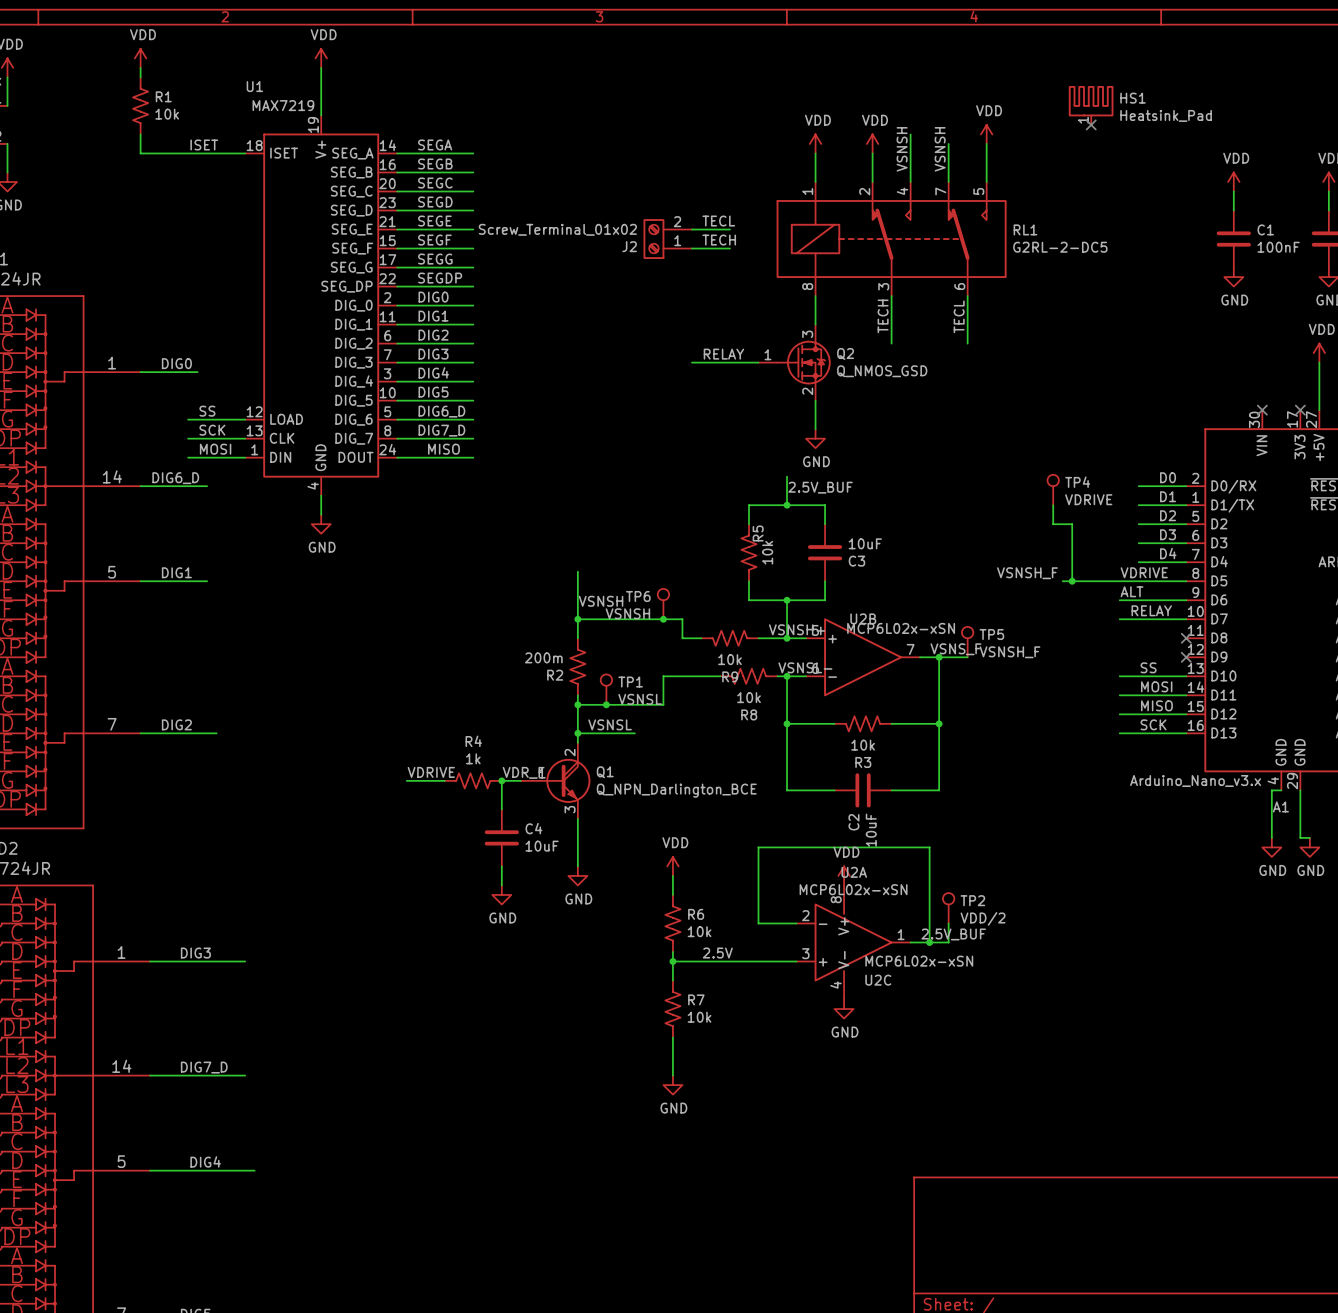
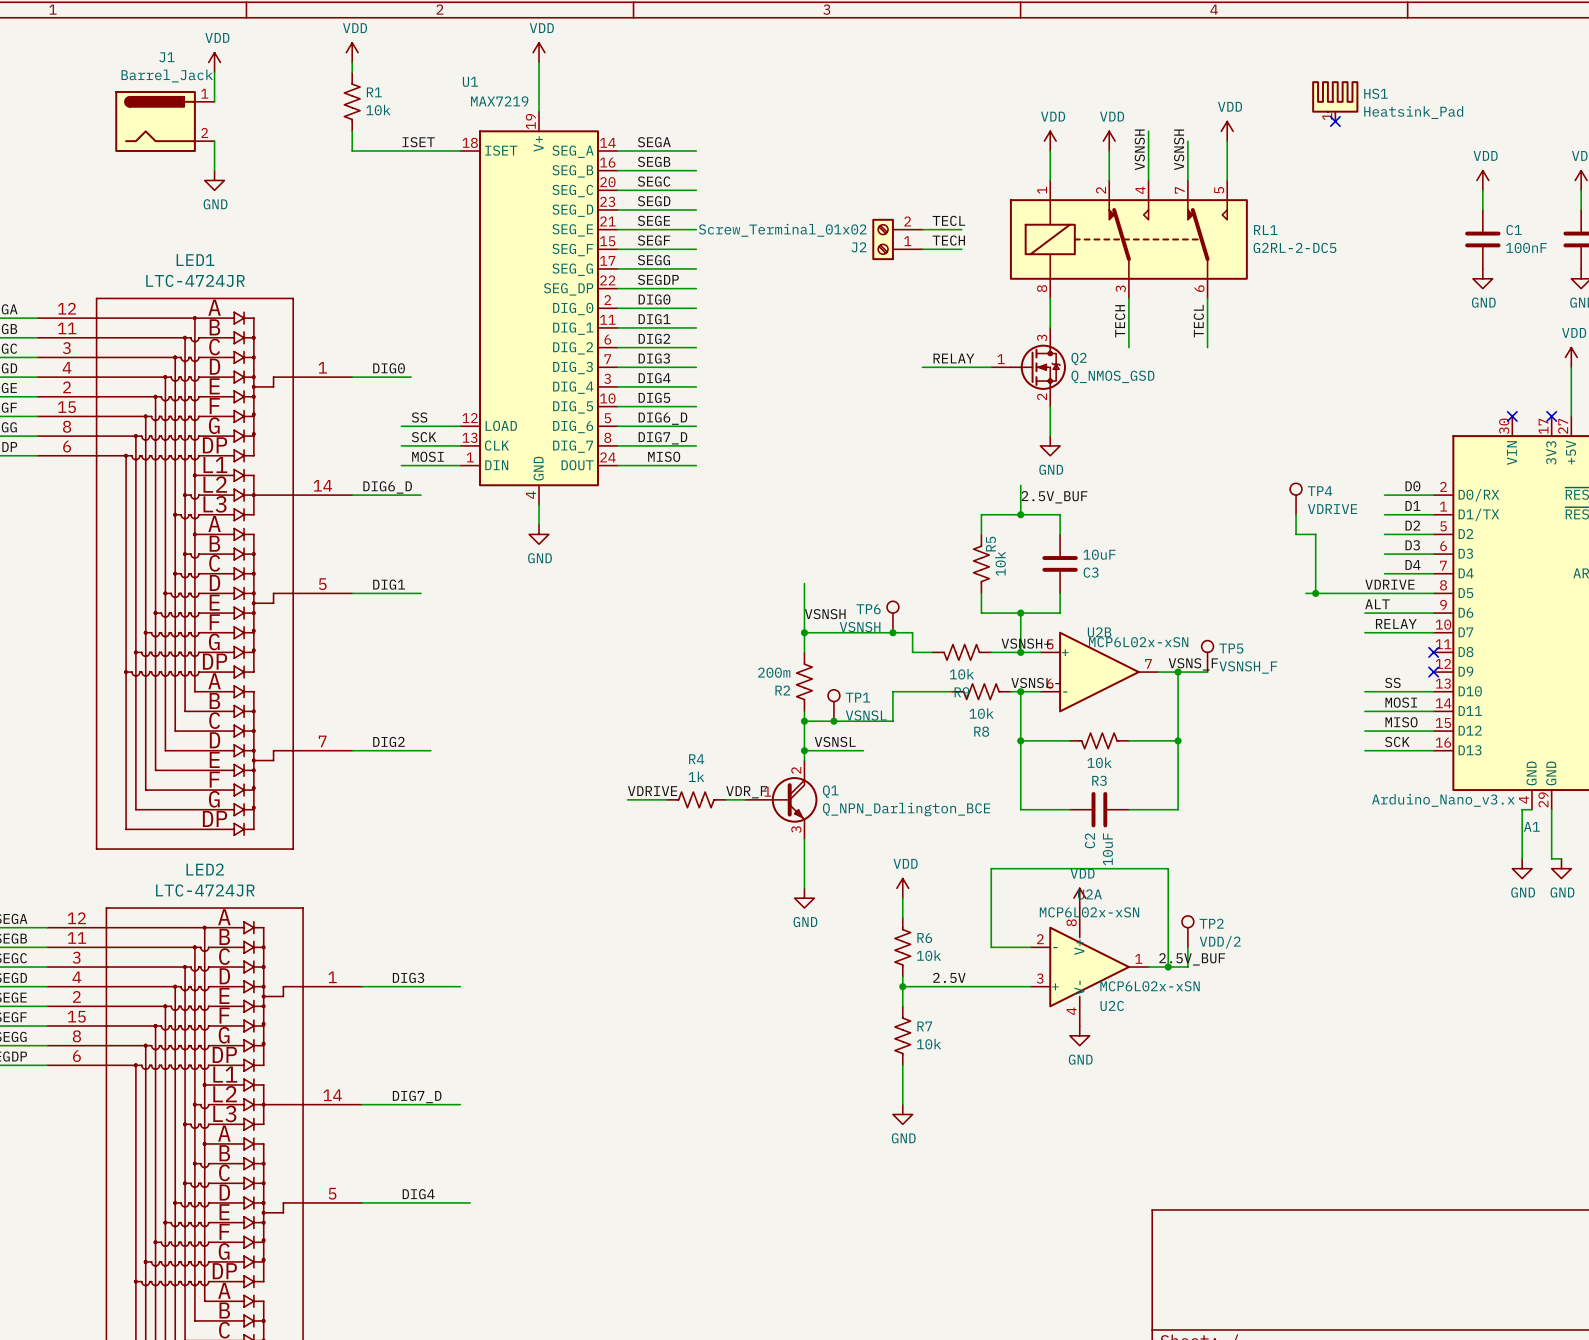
label: VSNSH_F (1027, 573) -> none
wire: (501, 780) (501, 809) -> none
junction: (501, 780) -> none
C4: 10uF (501, 837) -> none
wire: (501, 866) (501, 885) -> none
power symbol: GND (501, 894) -> none

